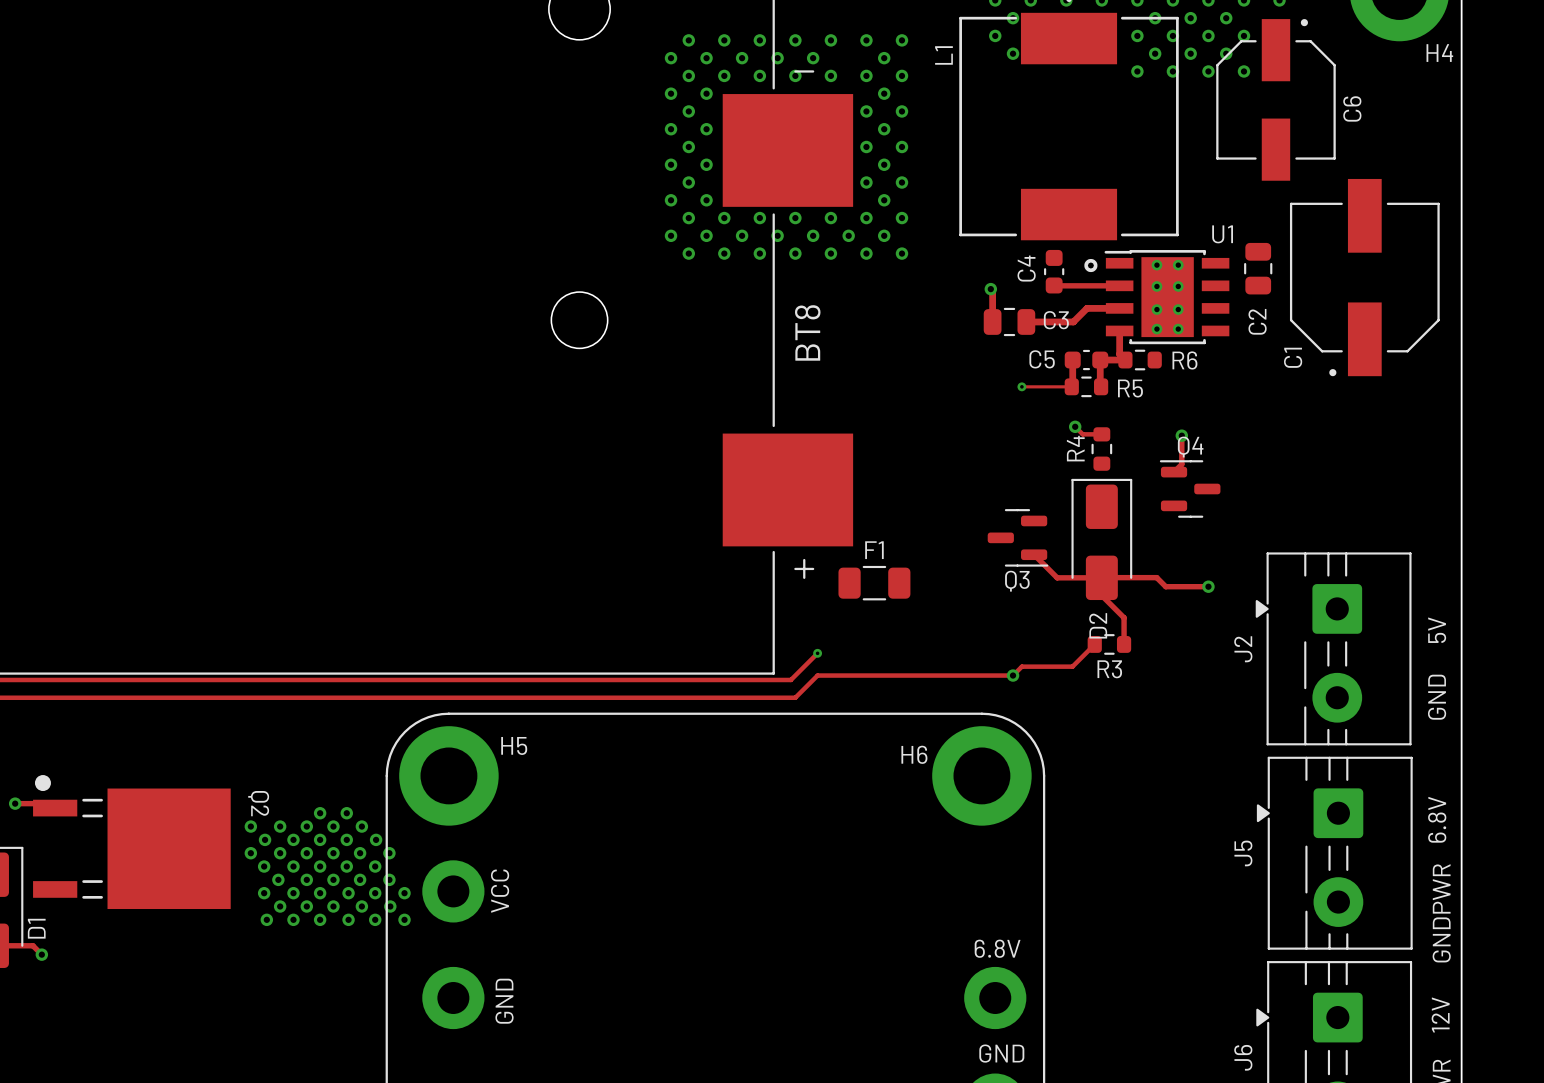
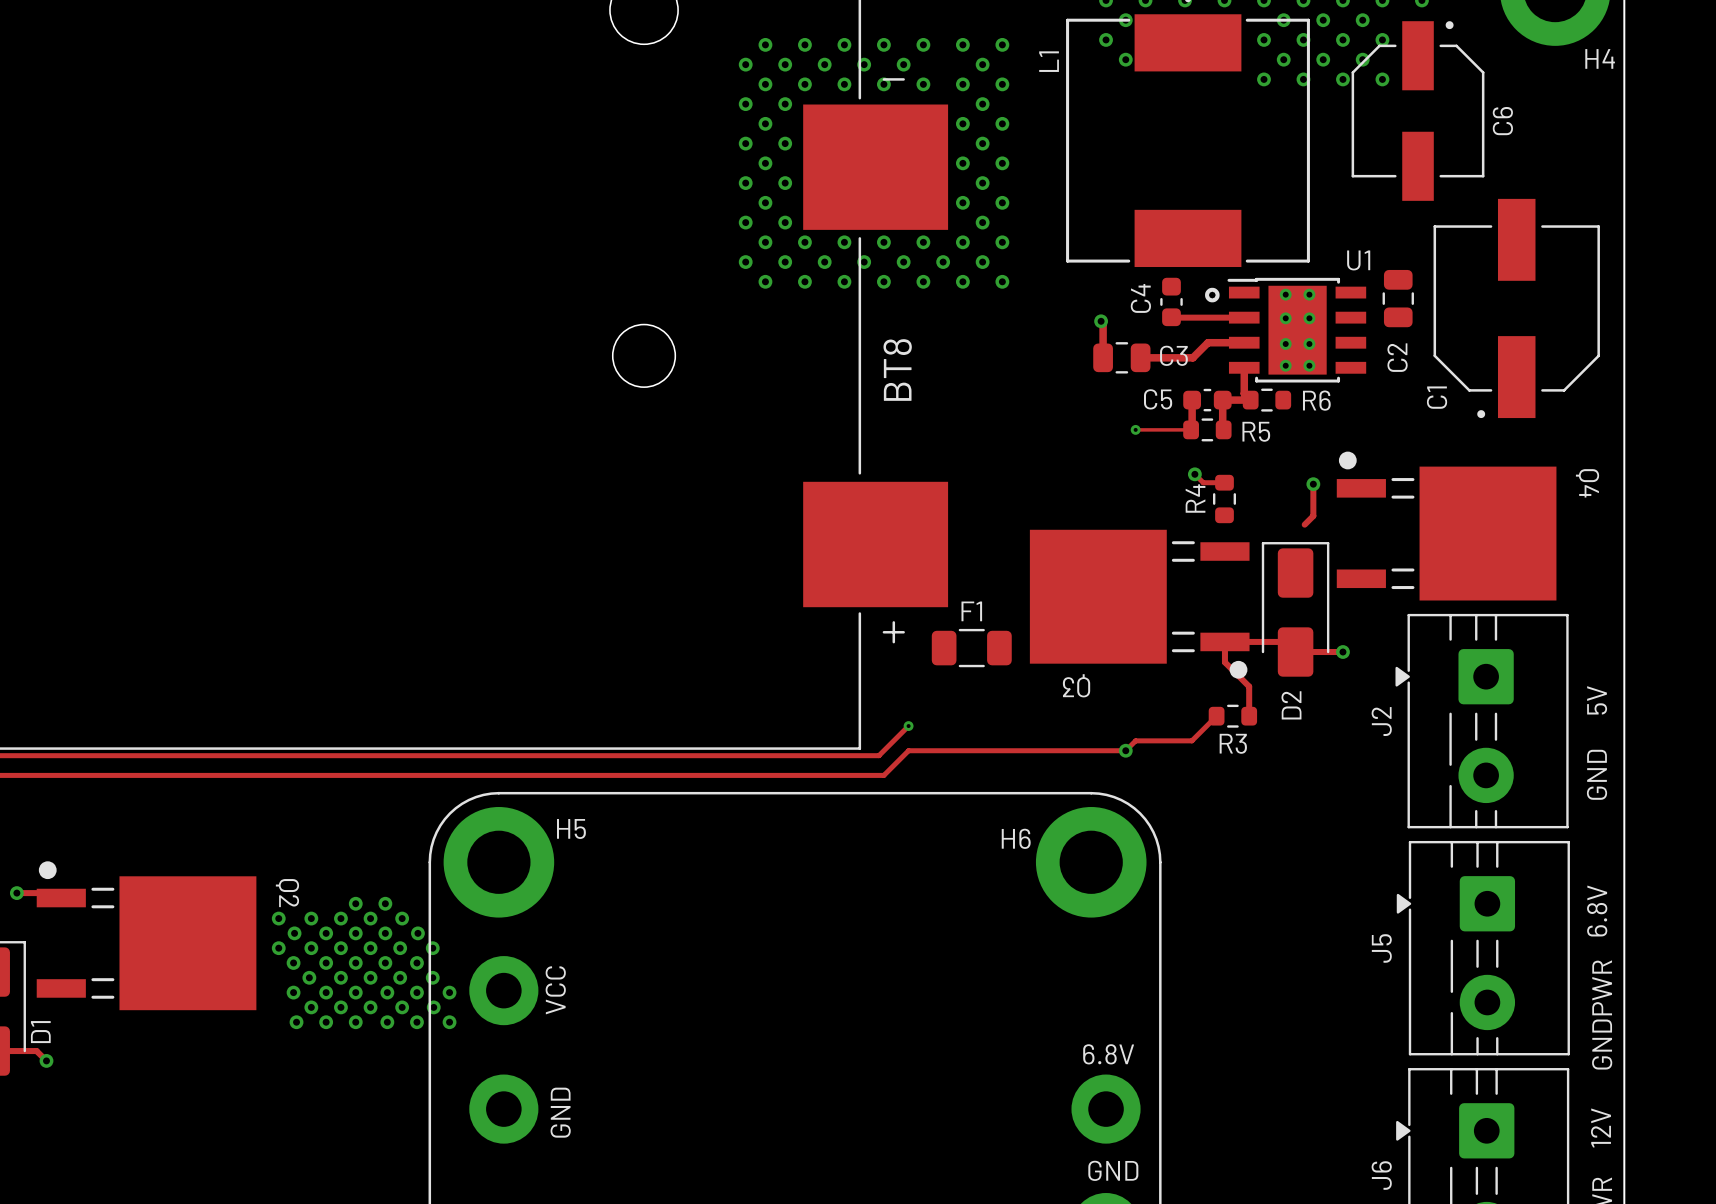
Q4 name position: Q4 (1190, 447) -> Q4 (1587, 483)
Q4 footprint: [1159, 460, 1221, 518] -> [1336, 451, 1557, 601]
Q3 footprint: [987, 509, 1049, 567] -> [1029, 529, 1250, 679]
D2 position: (1101, 539) -> (1295, 609)
track: (1034, 554) (1057, 577) (1101, 577) -> none
Q3 name position: Q3 (1017, 581) -> Q3 (1076, 685)

